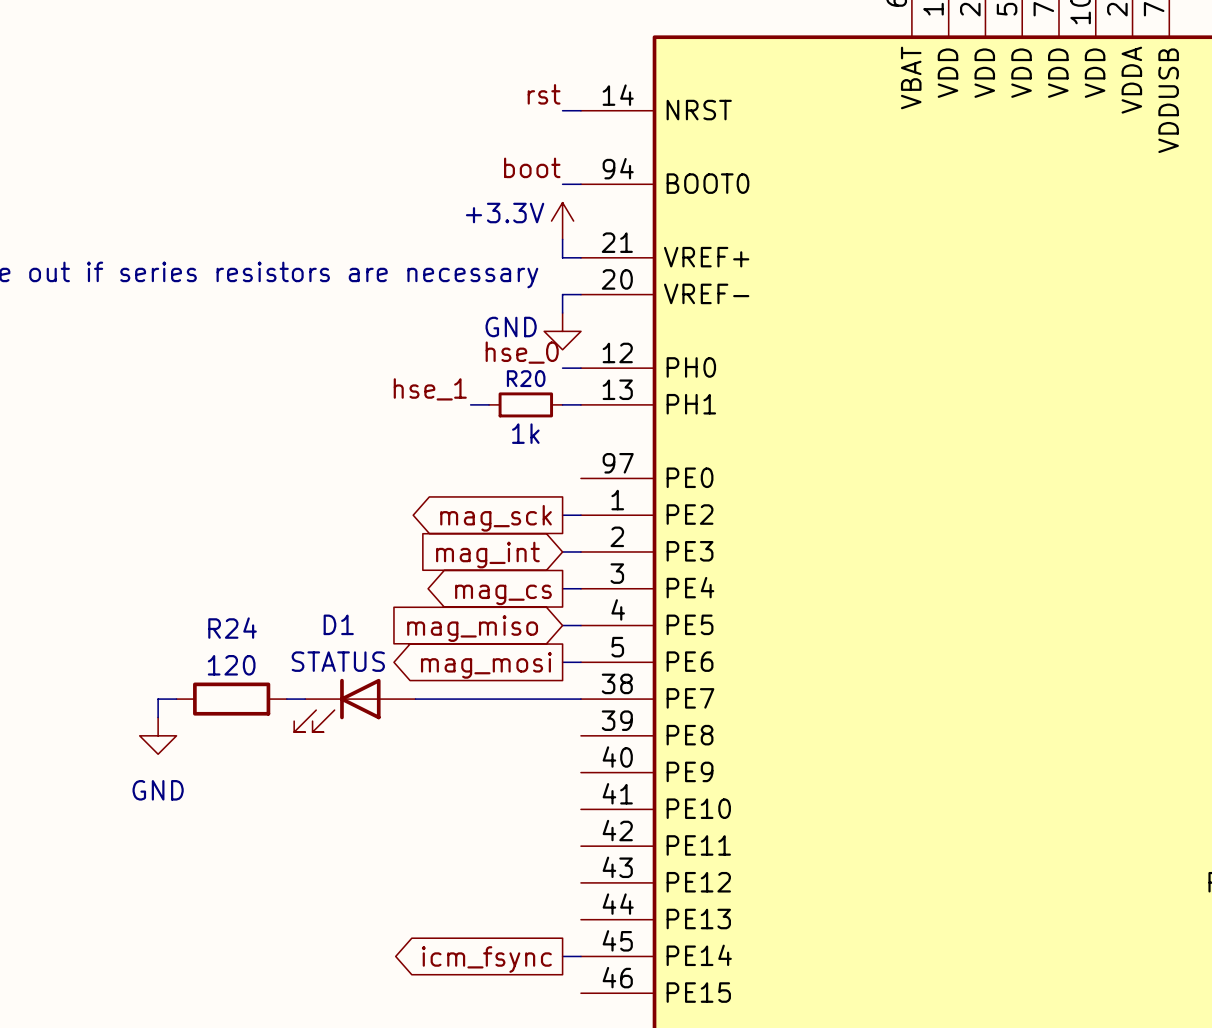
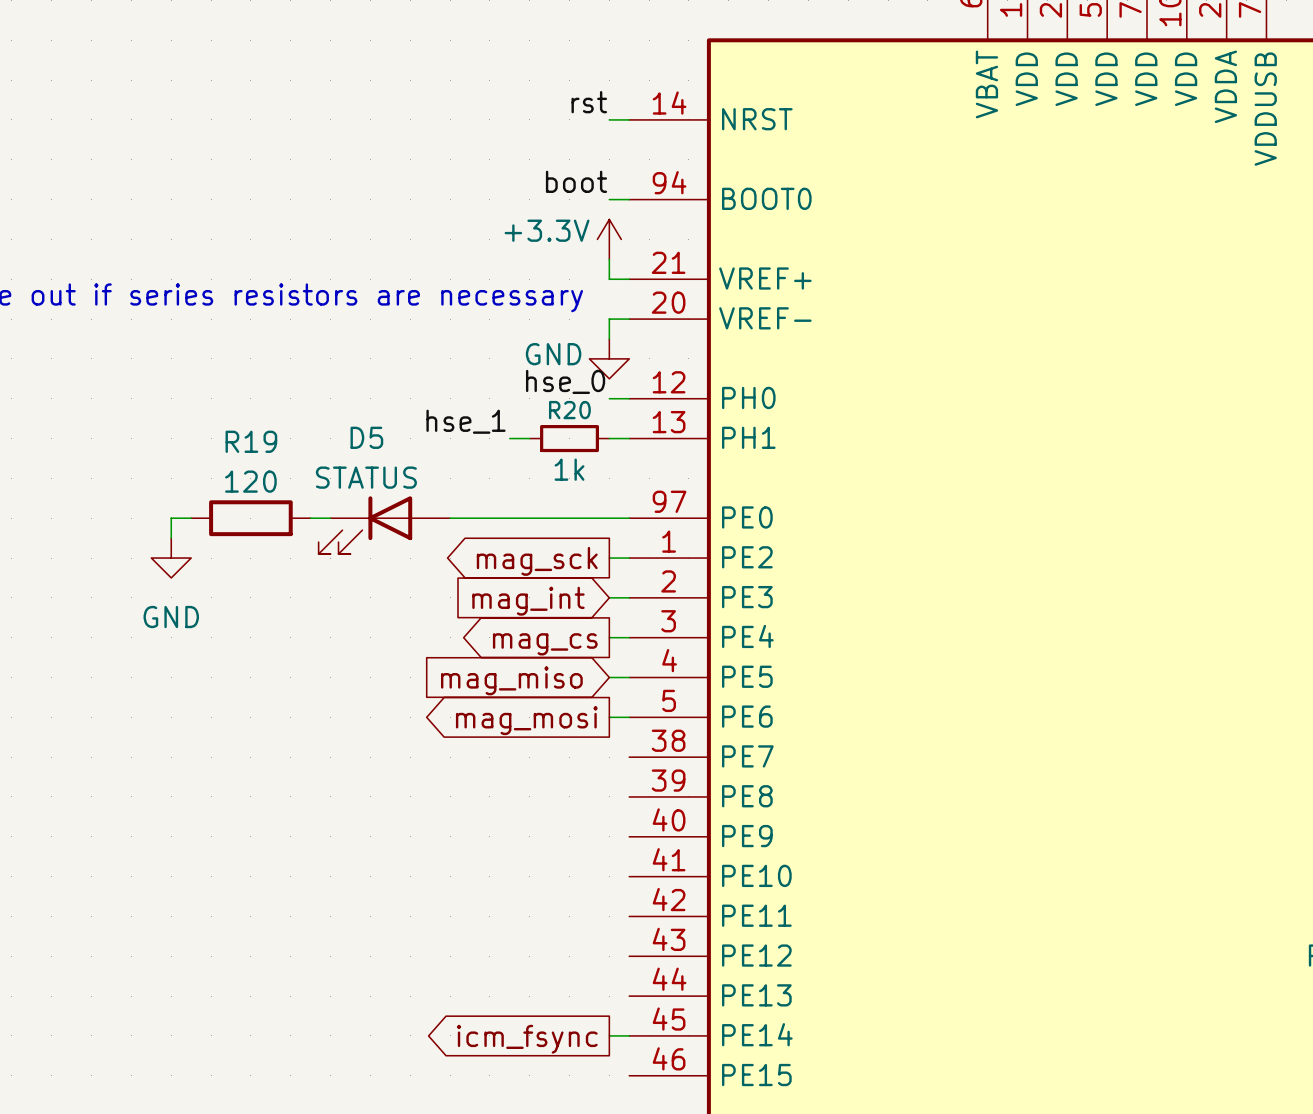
R19: none -> 120 (250, 518)
D5: none -> STATUS (384, 525)
wire: (176, 699) (158, 699) (158, 717) -> (191, 518) (171, 518) (171, 538)
R24: 120 (231, 699) -> none
wire: (286, 699) (305, 699) -> (310, 518) (330, 518)
wire: (415, 699) (580, 699) -> (450, 518) (629, 518)
D1: STATUS (354, 705) -> none
power symbol position: GND (158, 735) -> GND (171, 558)

